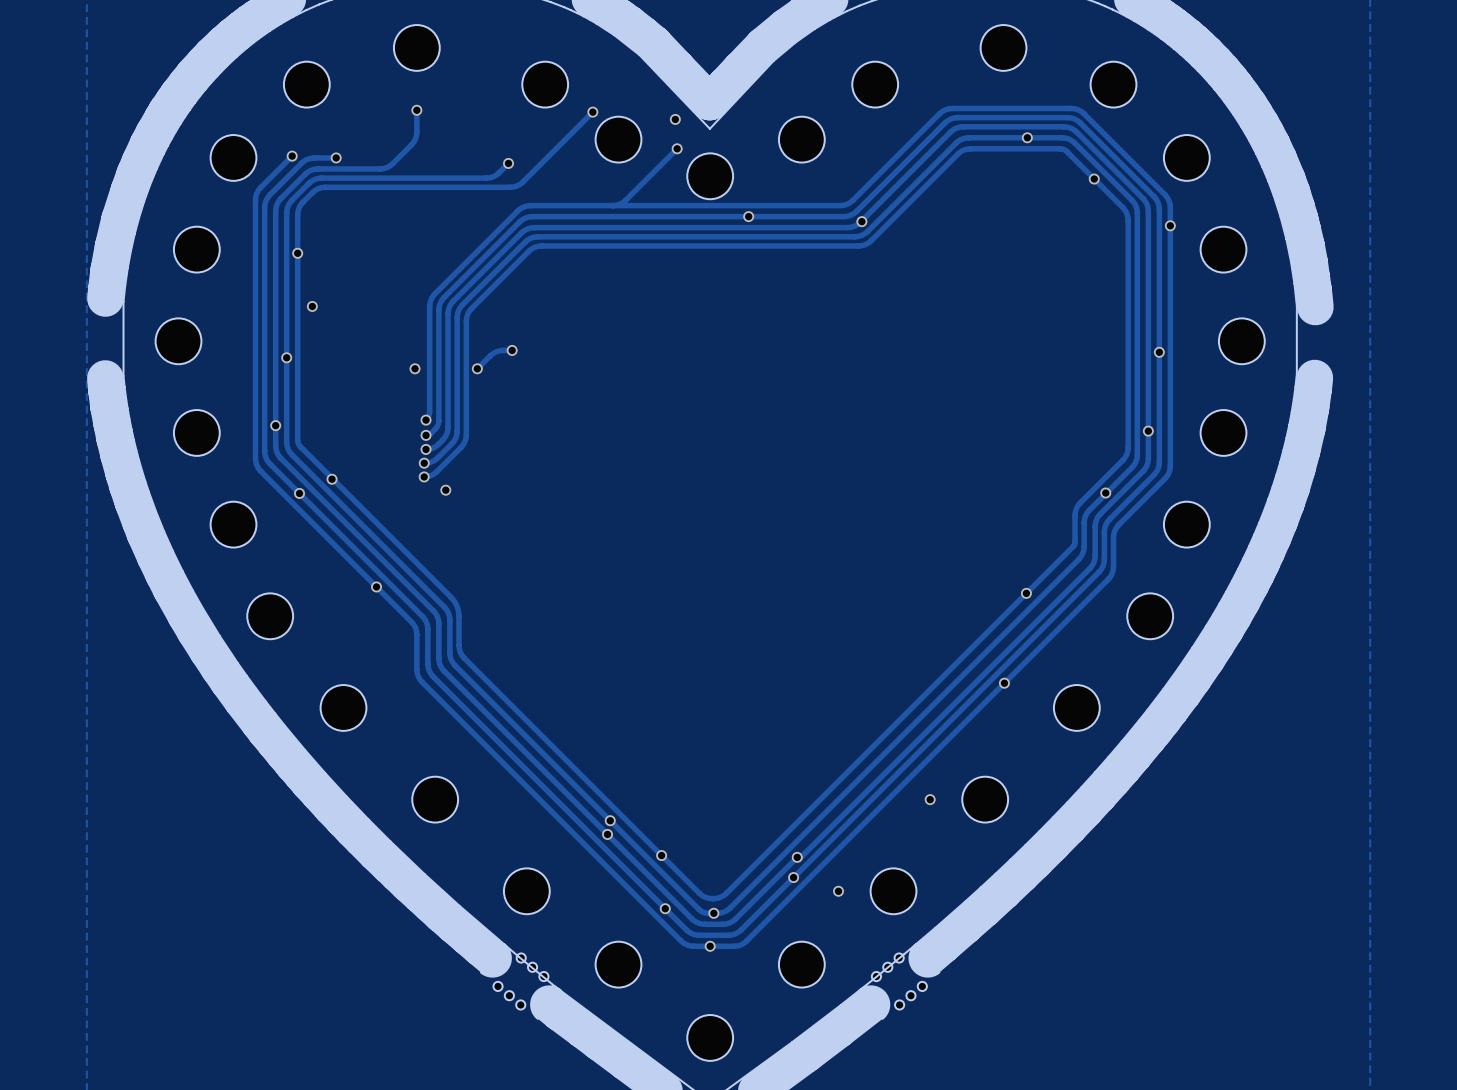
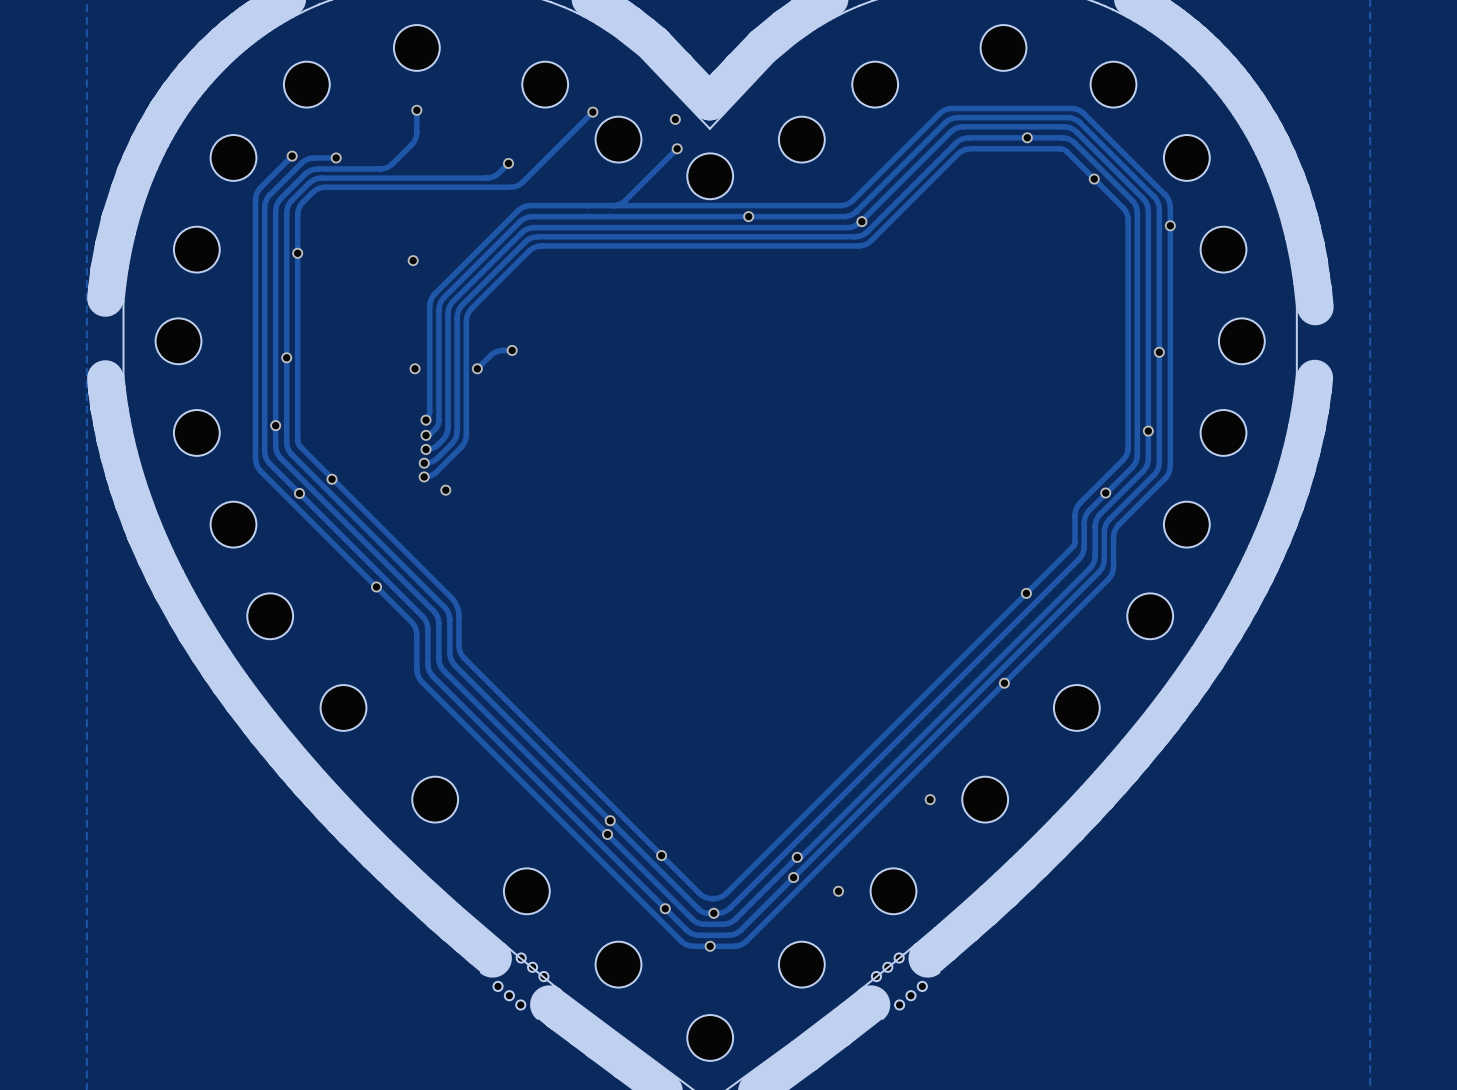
via: none -> (413, 260)
via: (312, 306) -> none

